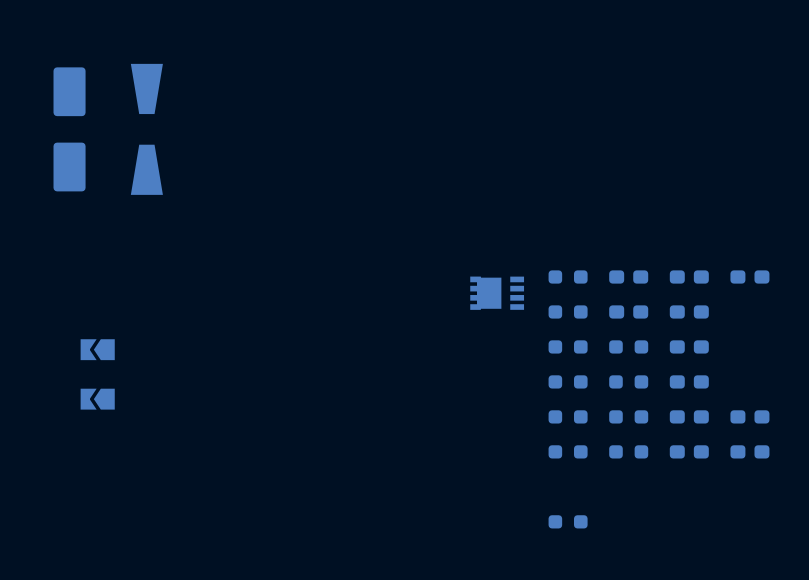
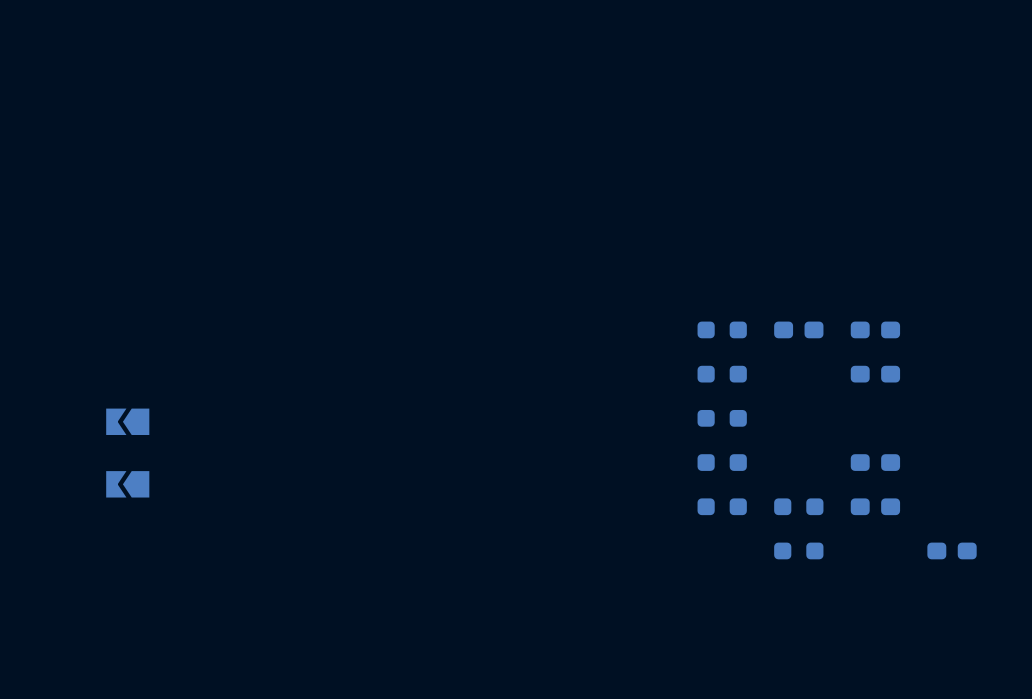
part: (69, 129) -> none
part: (146, 129) -> none
part: (749, 276) -> none
part: (497, 293) -> none
part: (628, 311) -> none
part: (628, 346) -> none
part: (689, 346) -> none
part: (628, 381) -> none
part: (749, 416) -> none
part: (568, 451) -> none
part: (689, 451) -> none
part: (568, 521) -> none

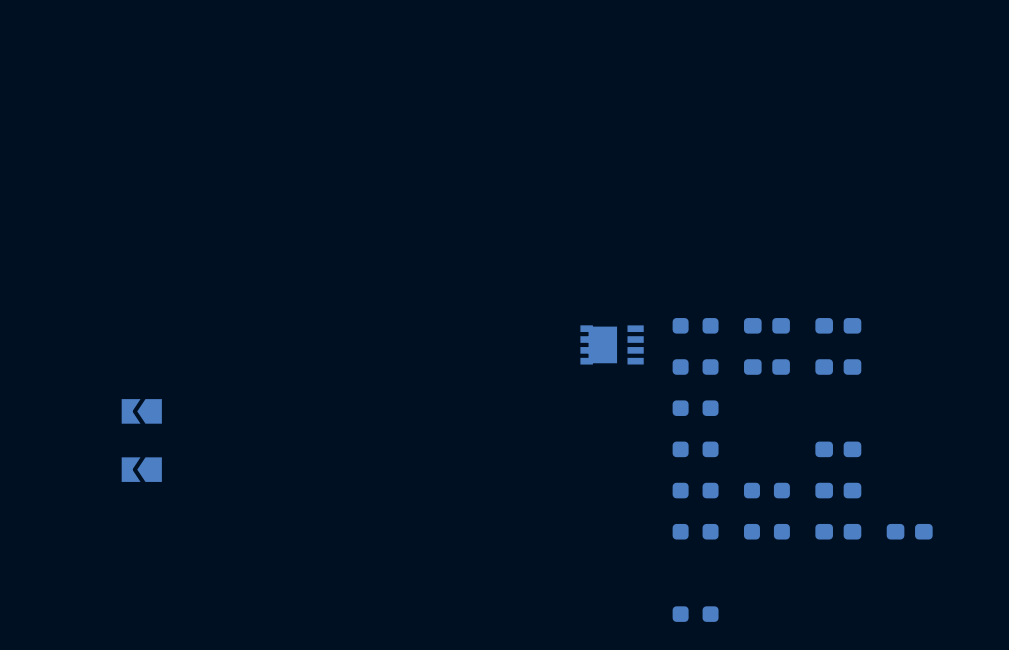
part: none -> (612, 344)
part: none -> (766, 367)
part: none -> (695, 531)
part: none -> (838, 531)
part: none -> (695, 614)

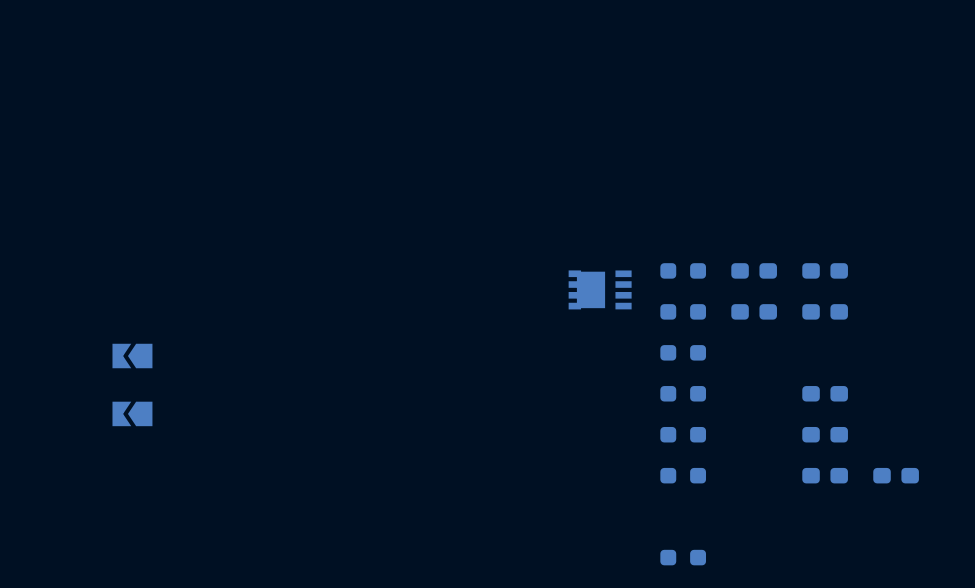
part: (766, 490) -> none
part: (766, 531) -> none

